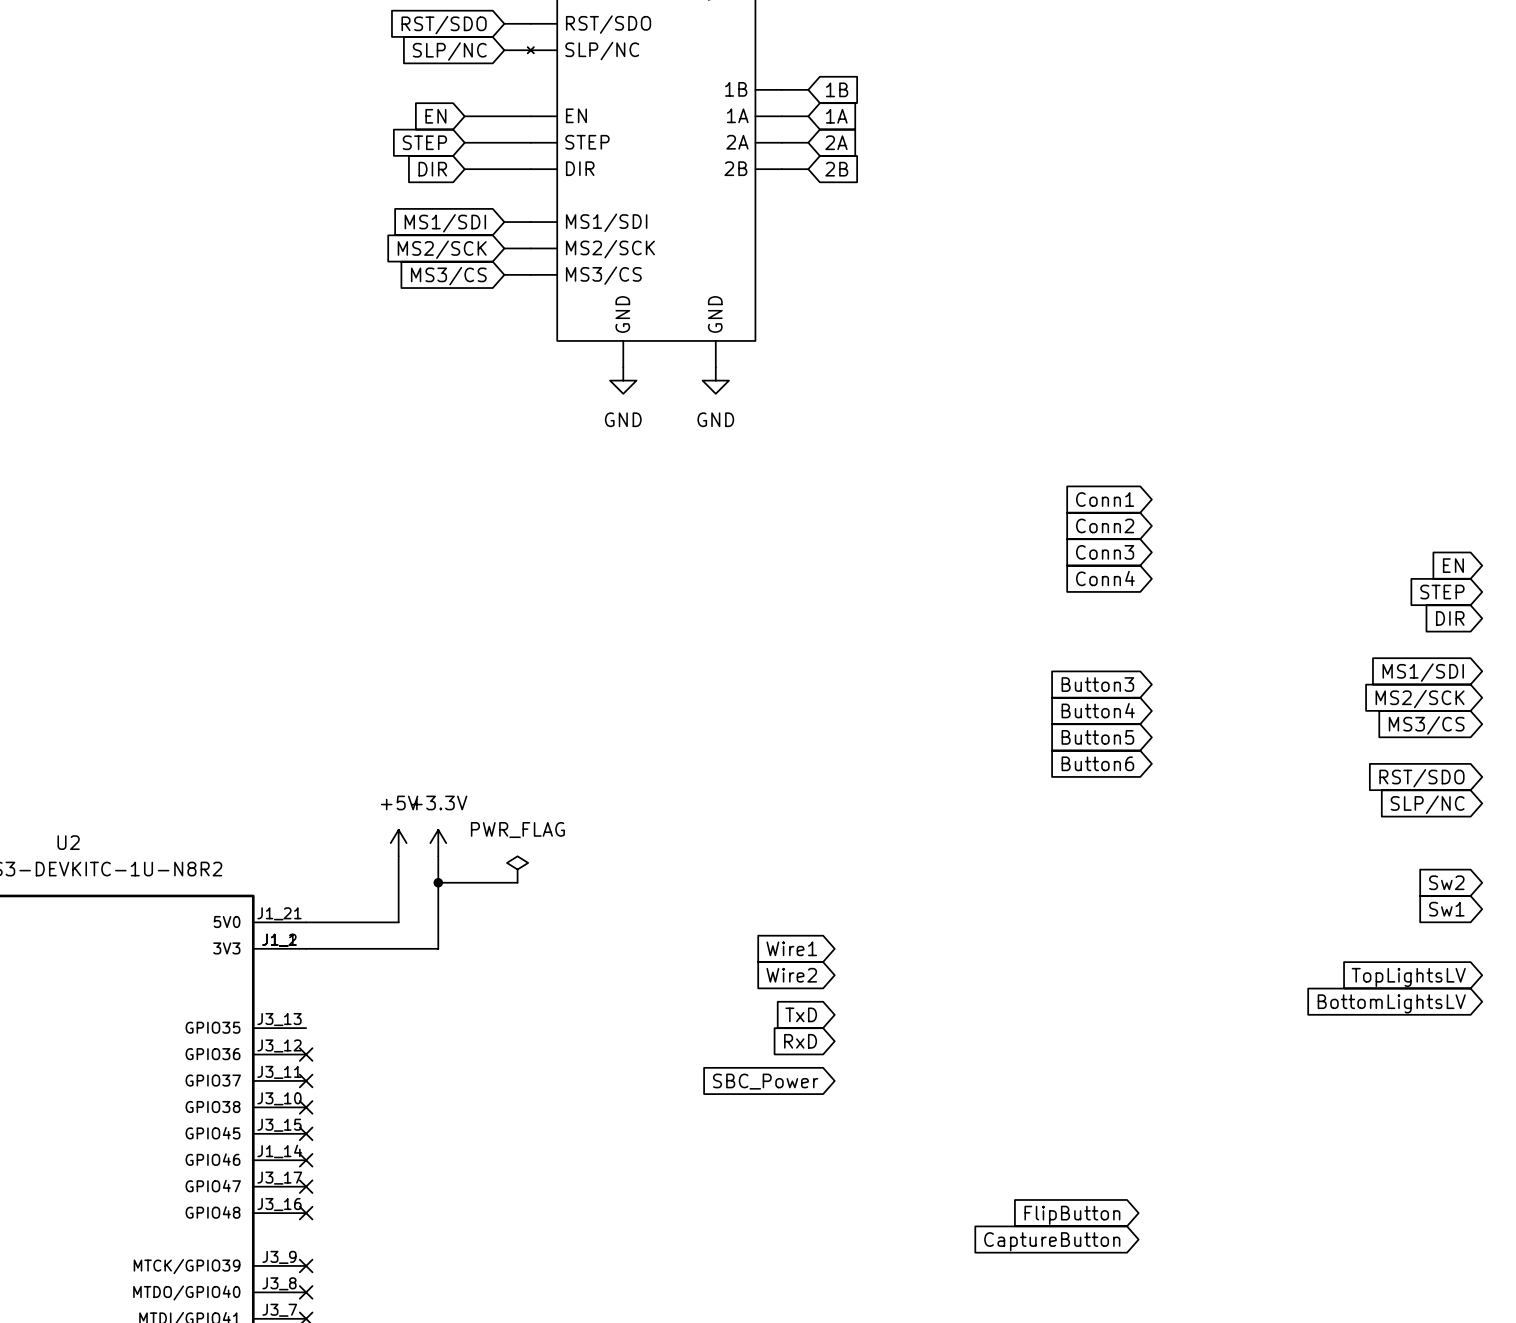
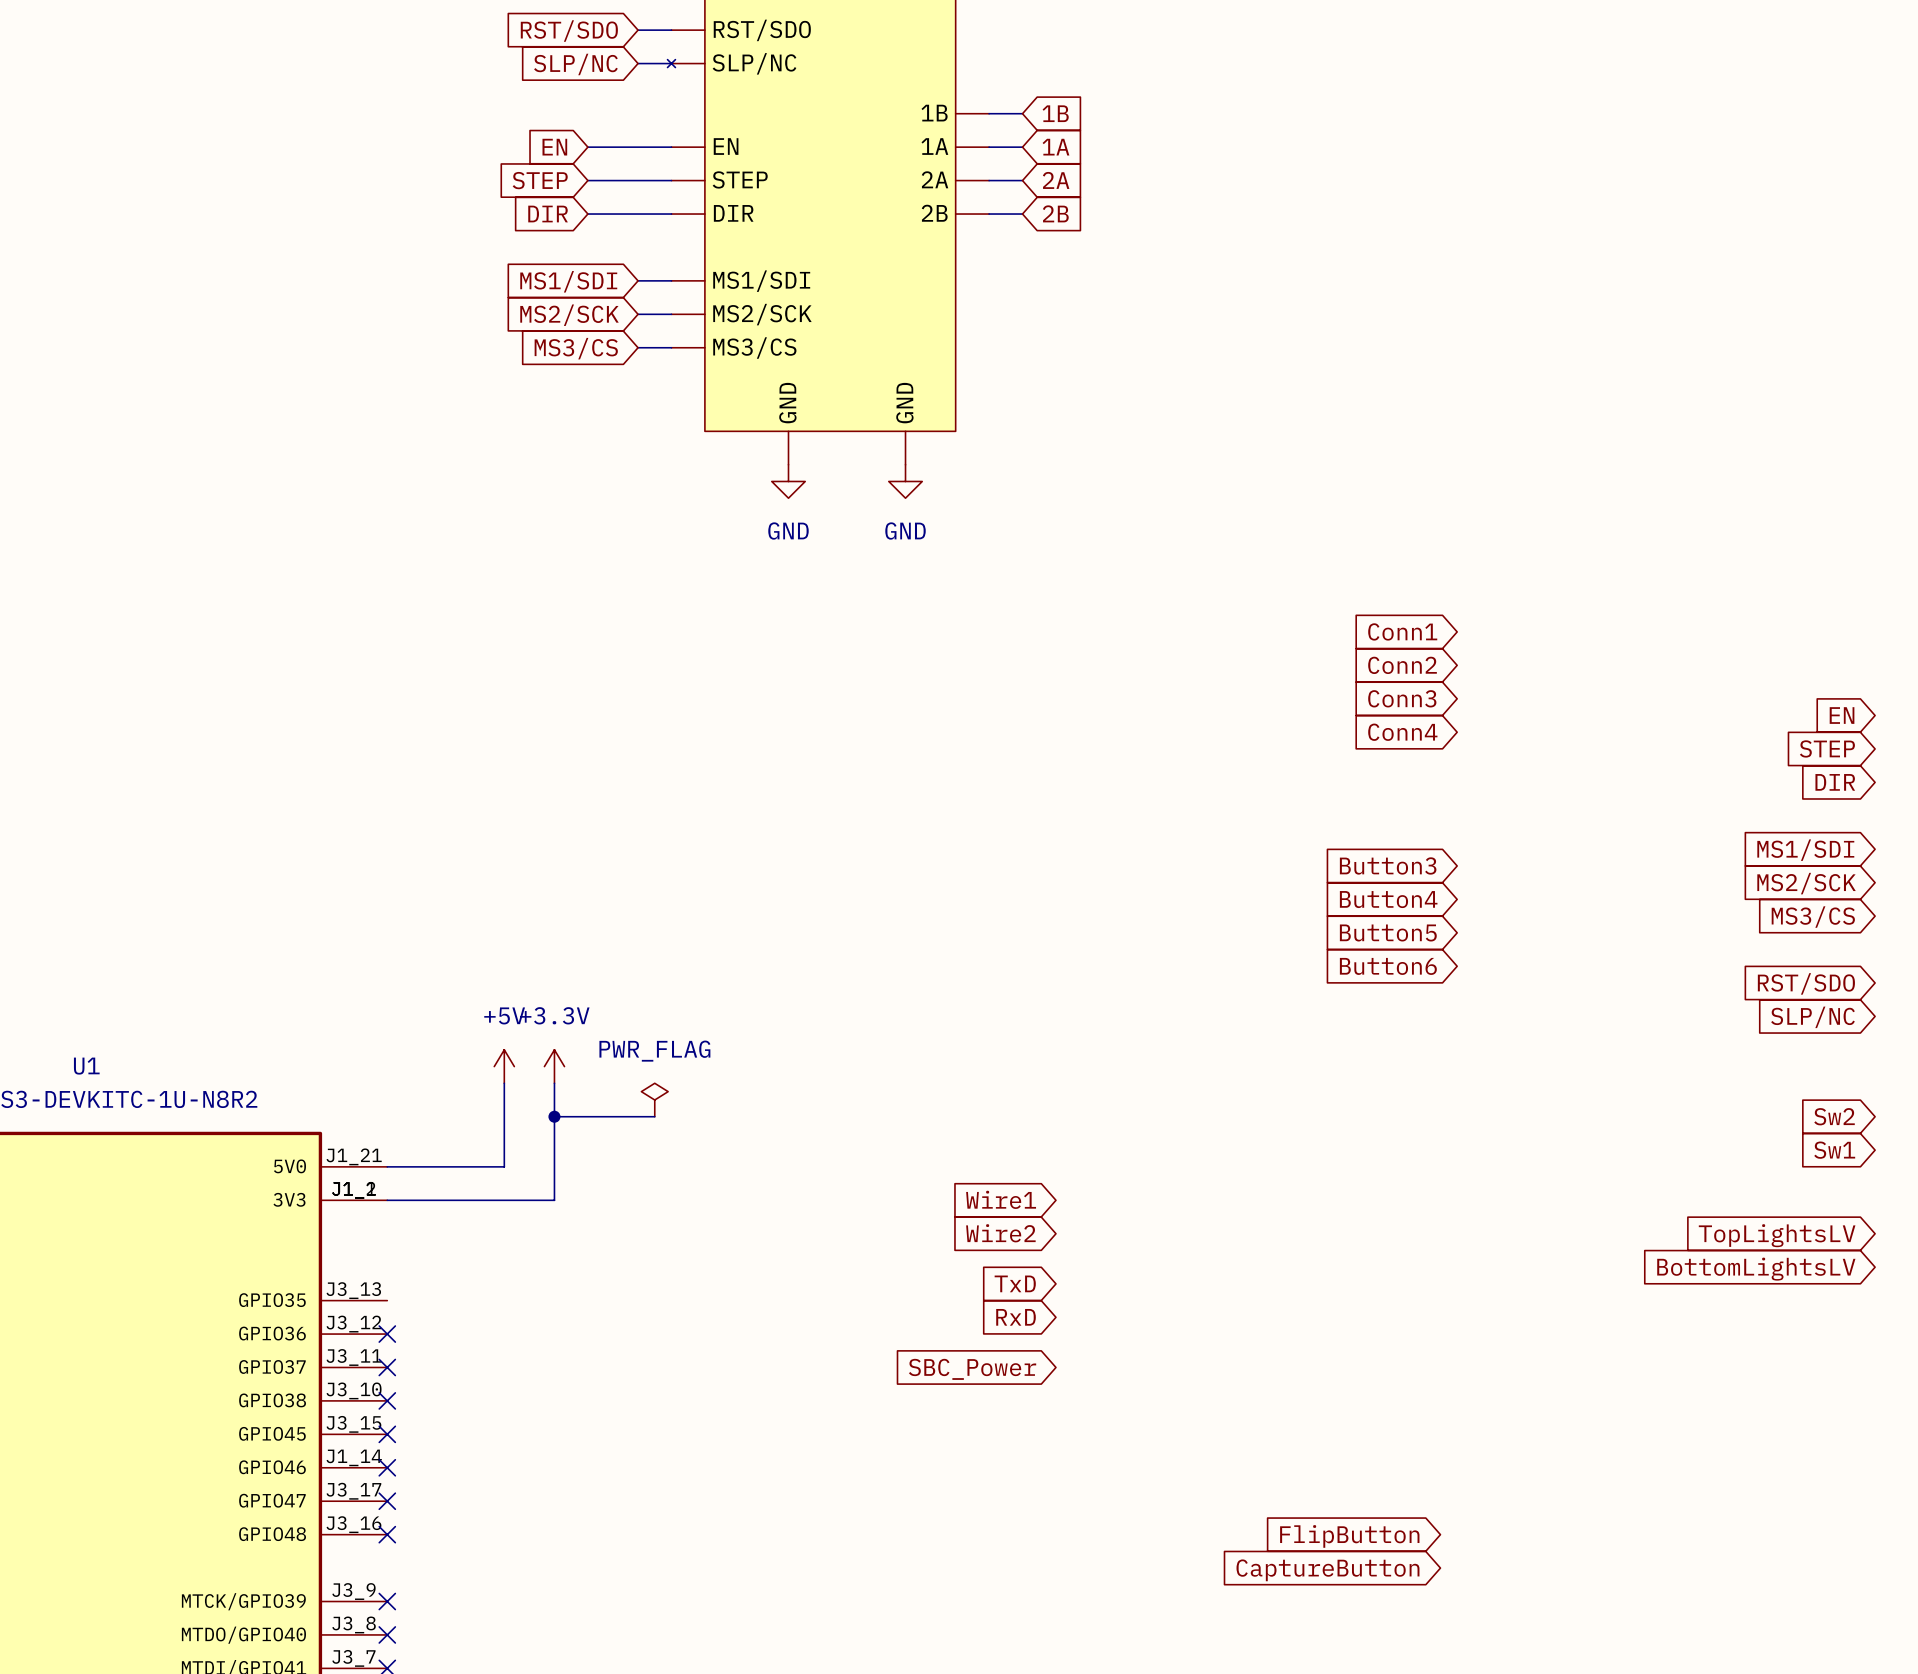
U2 name: U2 (68, 842) -> U1 (86, 1066)

